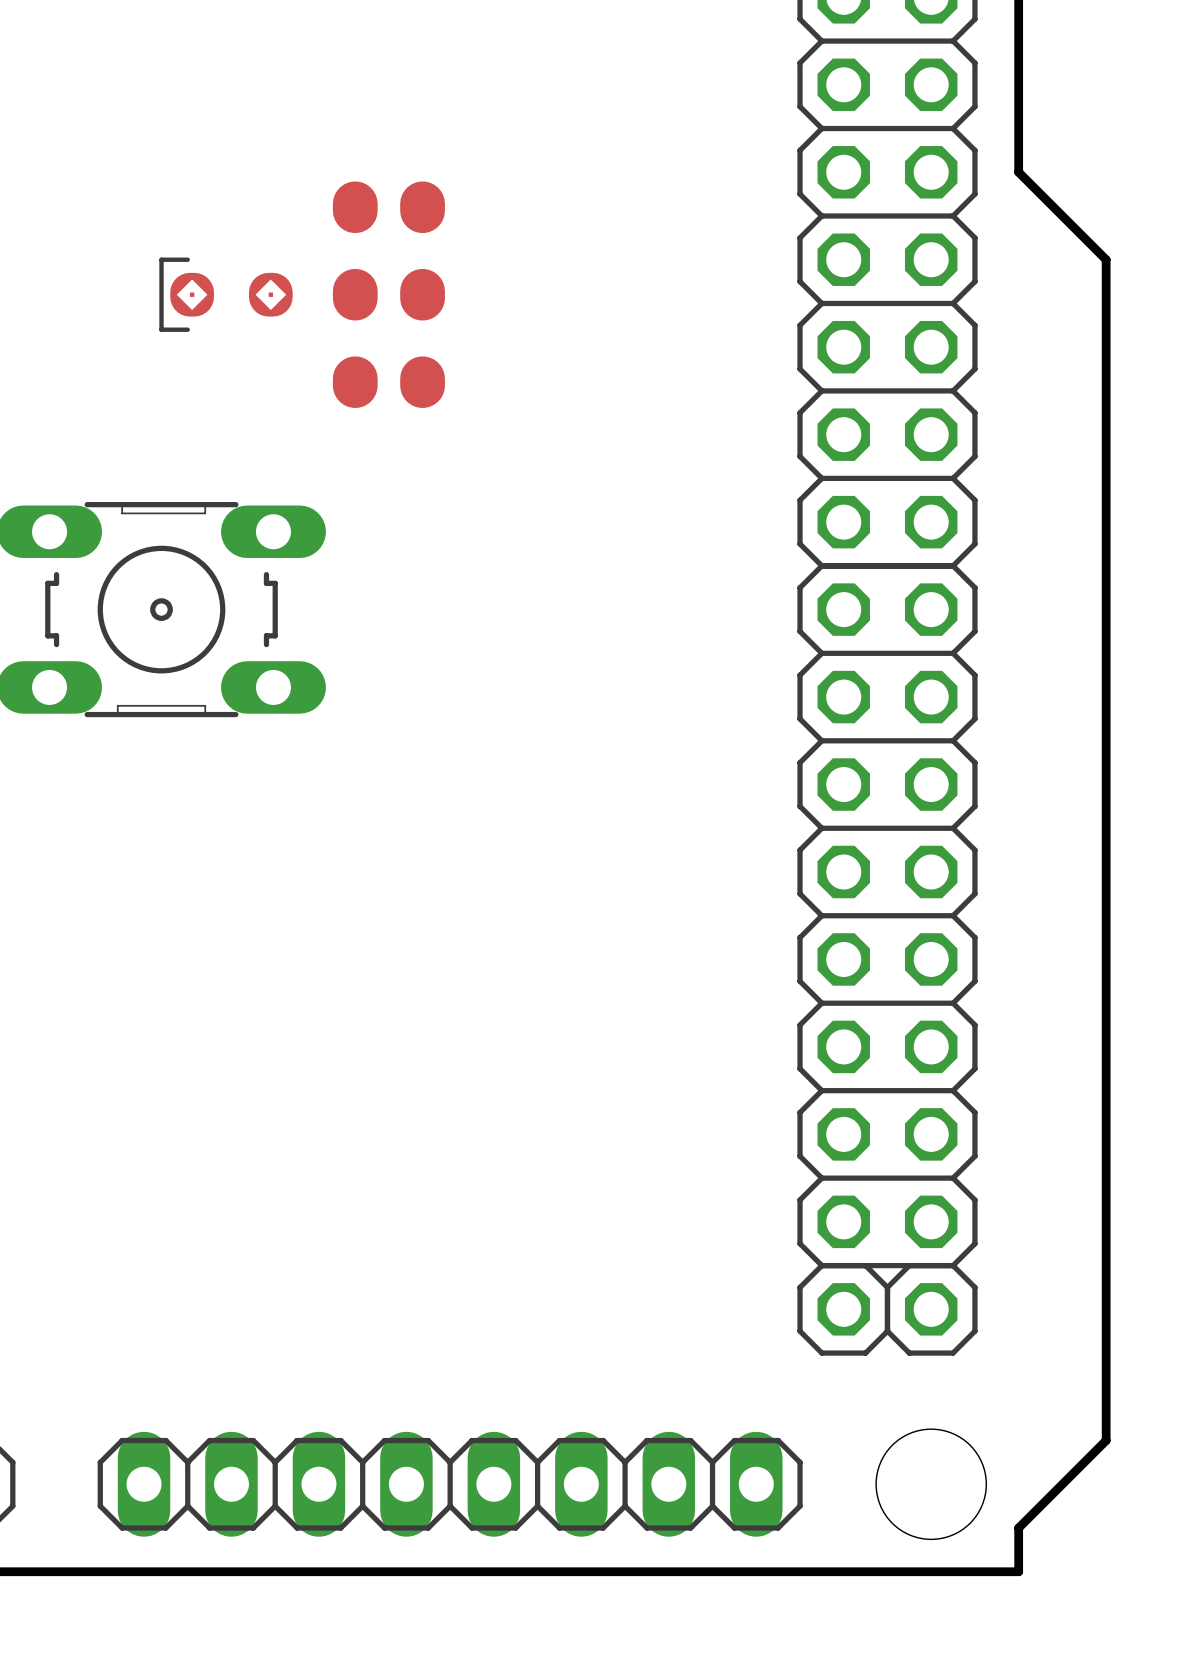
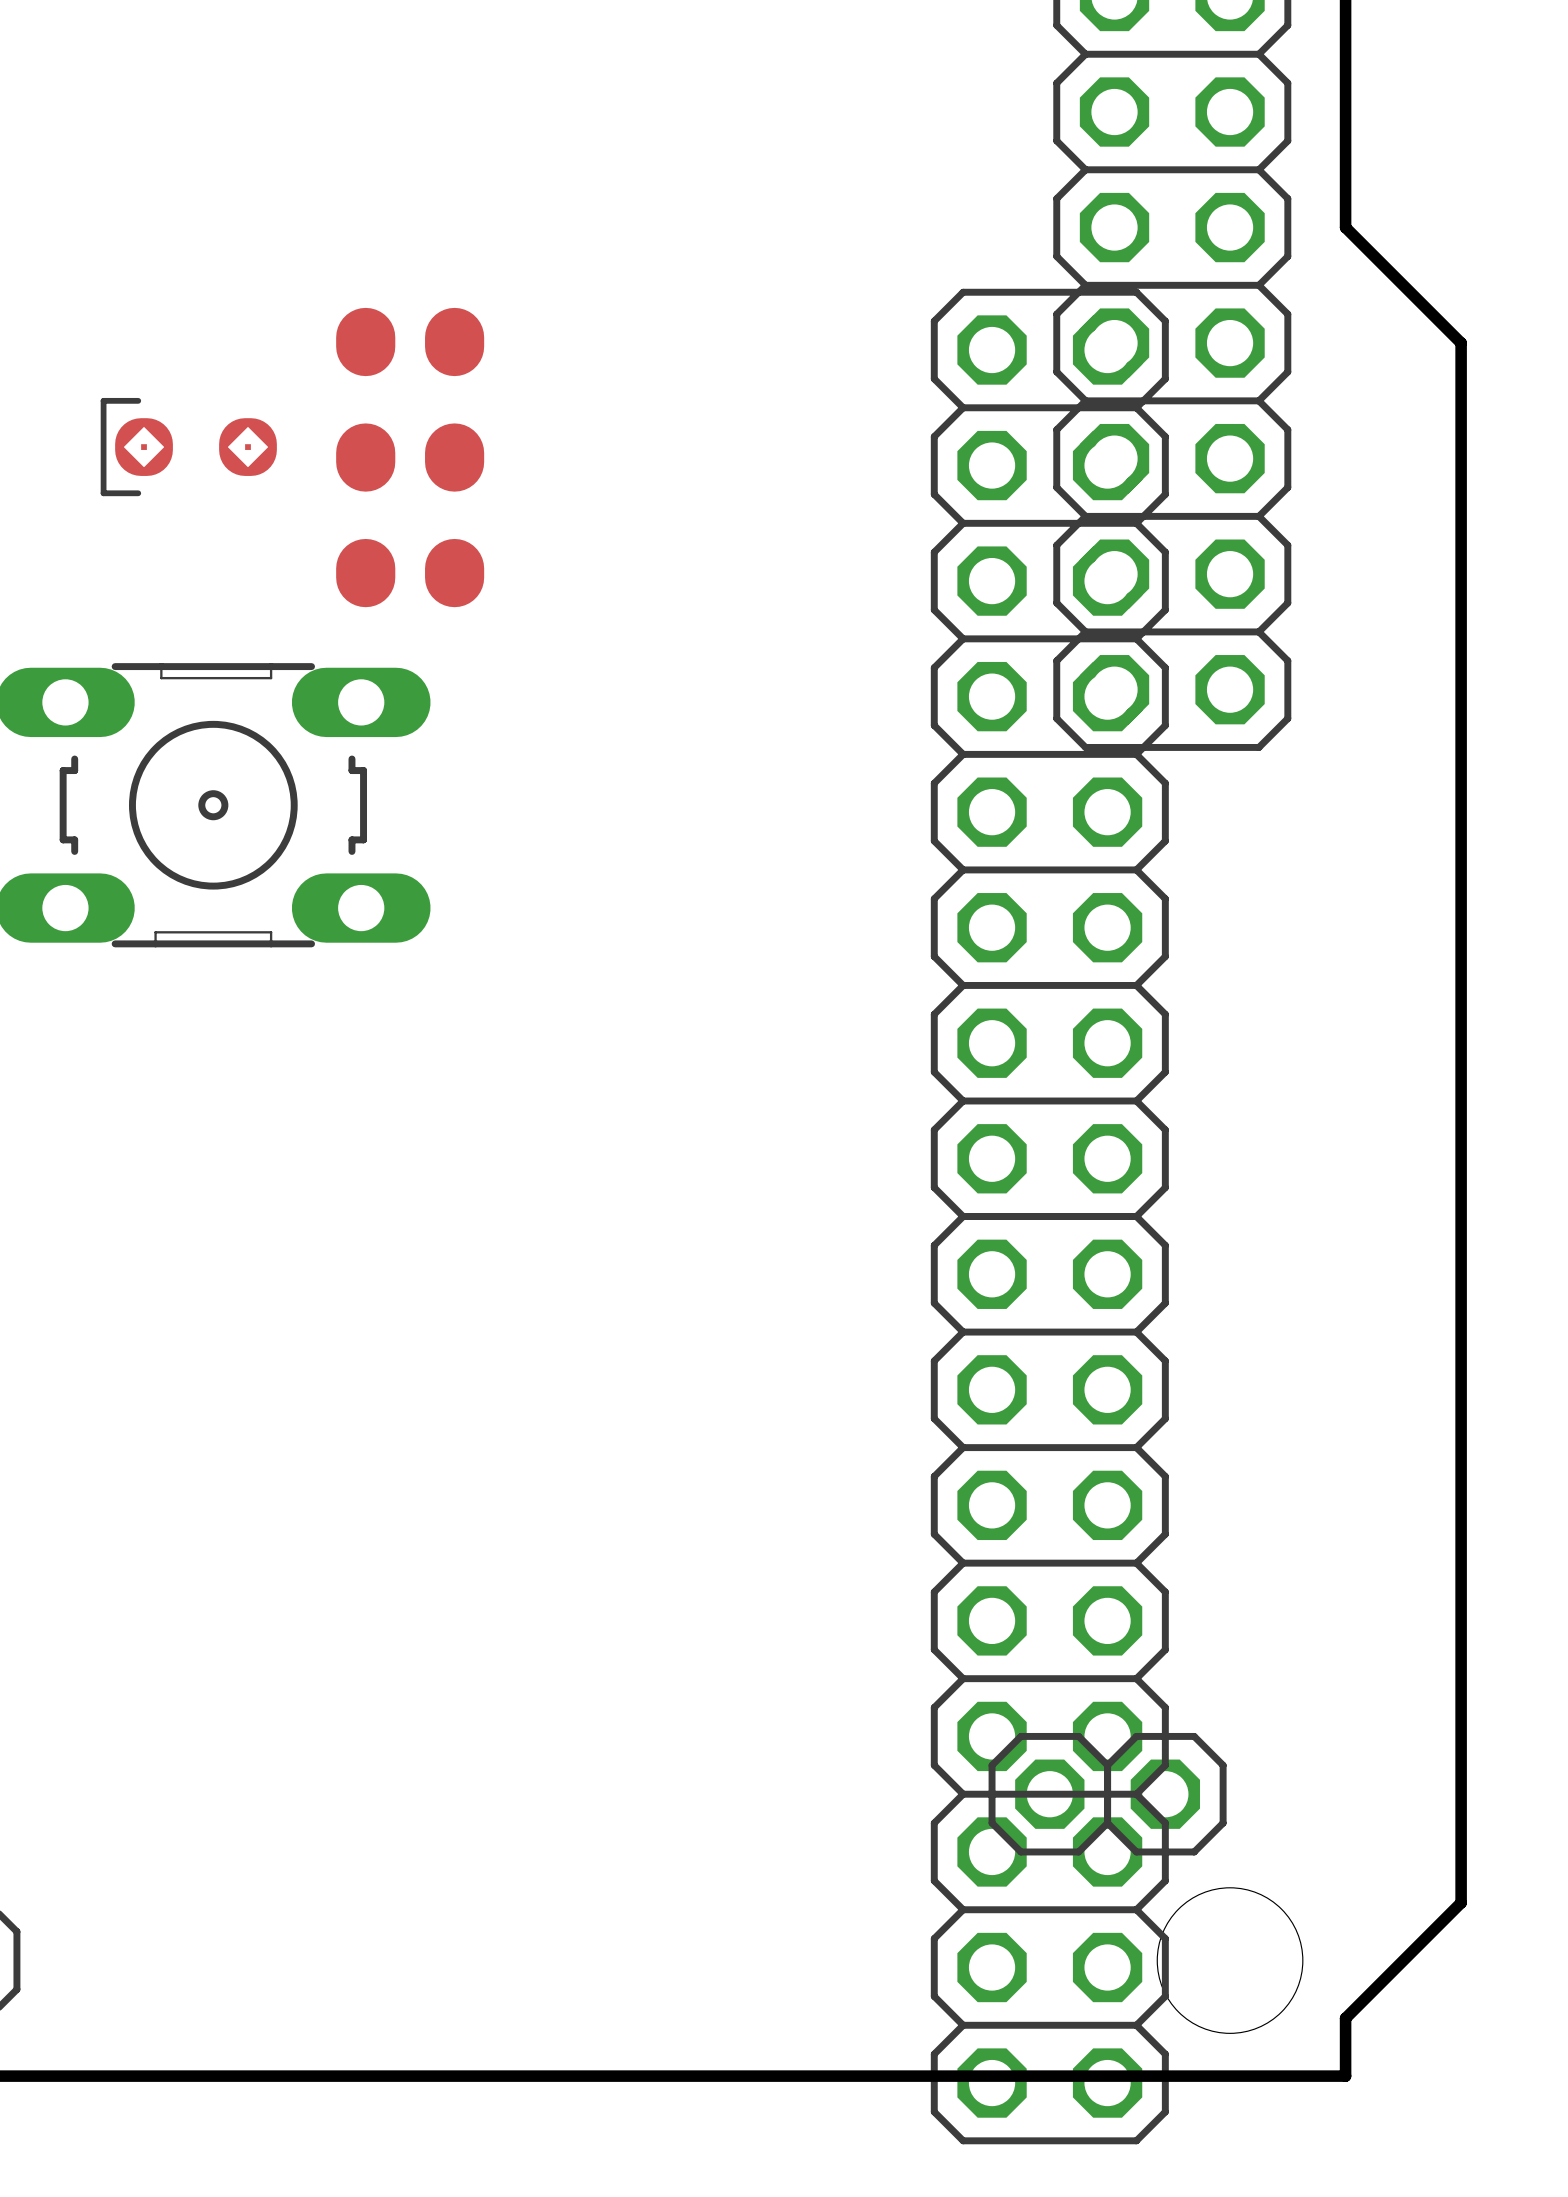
part: (388, 207) -> none
part: none -> (410, 341)
part position: (226, 294) -> (188, 447)
part: (388, 294) -> none
part: none -> (410, 457)
part: (388, 382) -> none
part: none -> (410, 573)
part: none -> (1049, 754)
part: (887, 915) -> none
part: none -> (1049, 1678)
part: (843, 1309) -> none
part: (931, 1309) -> none
part: none -> (1049, 1794)
part: none -> (1165, 1794)
part: (450, 1484) -> none

